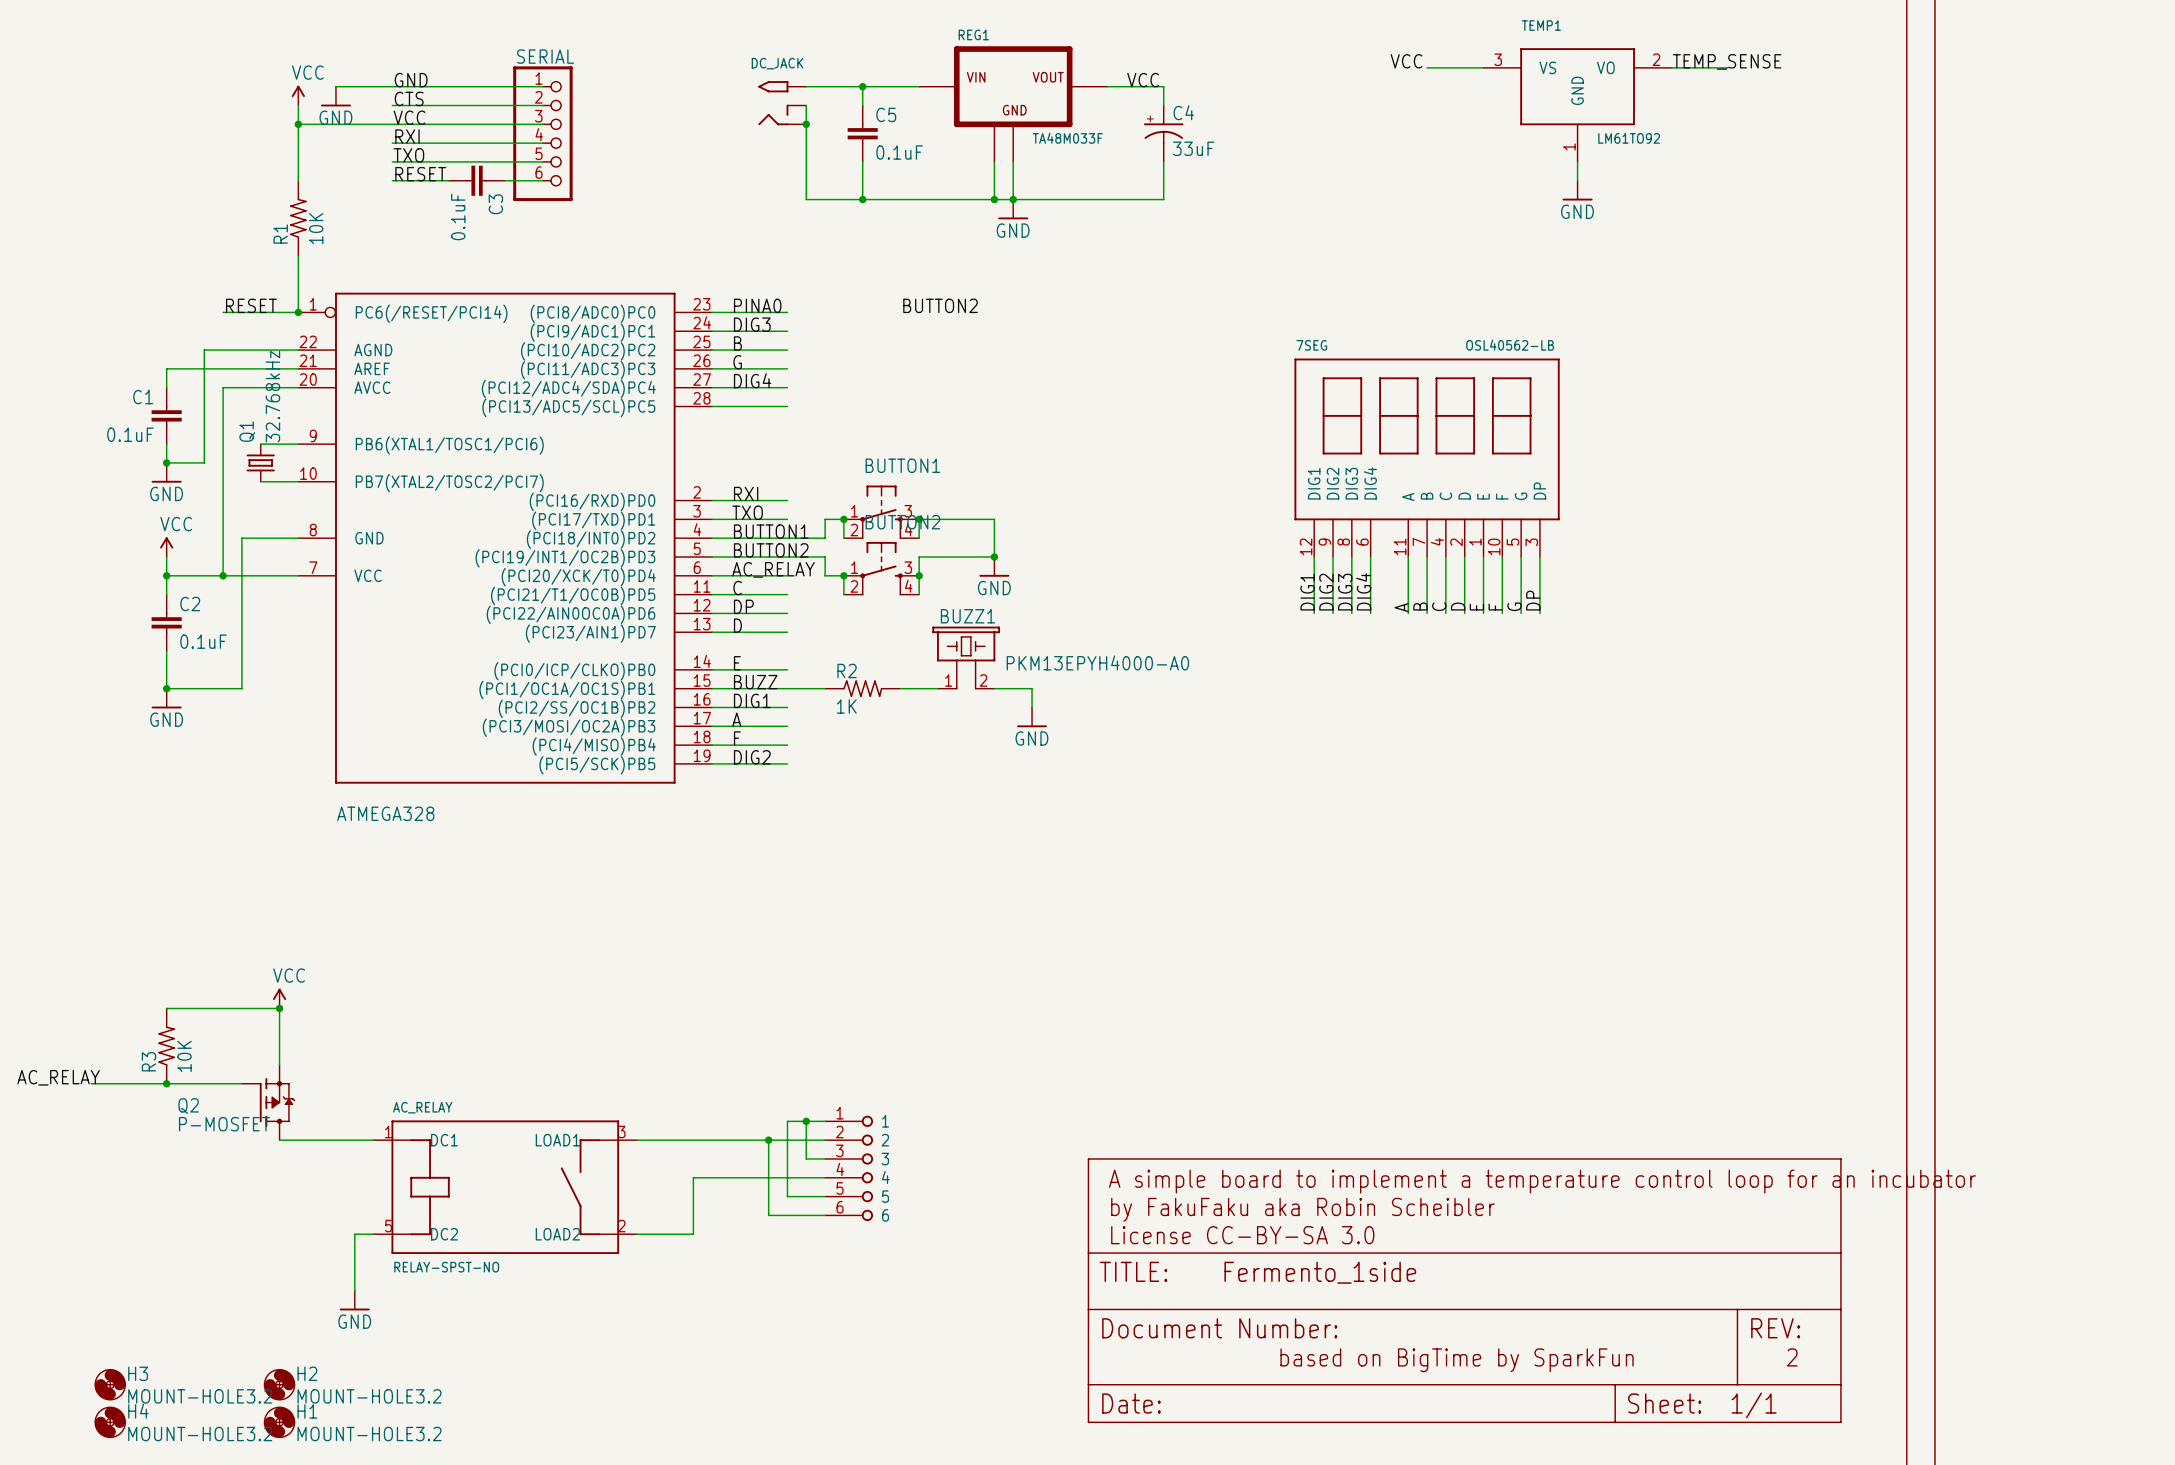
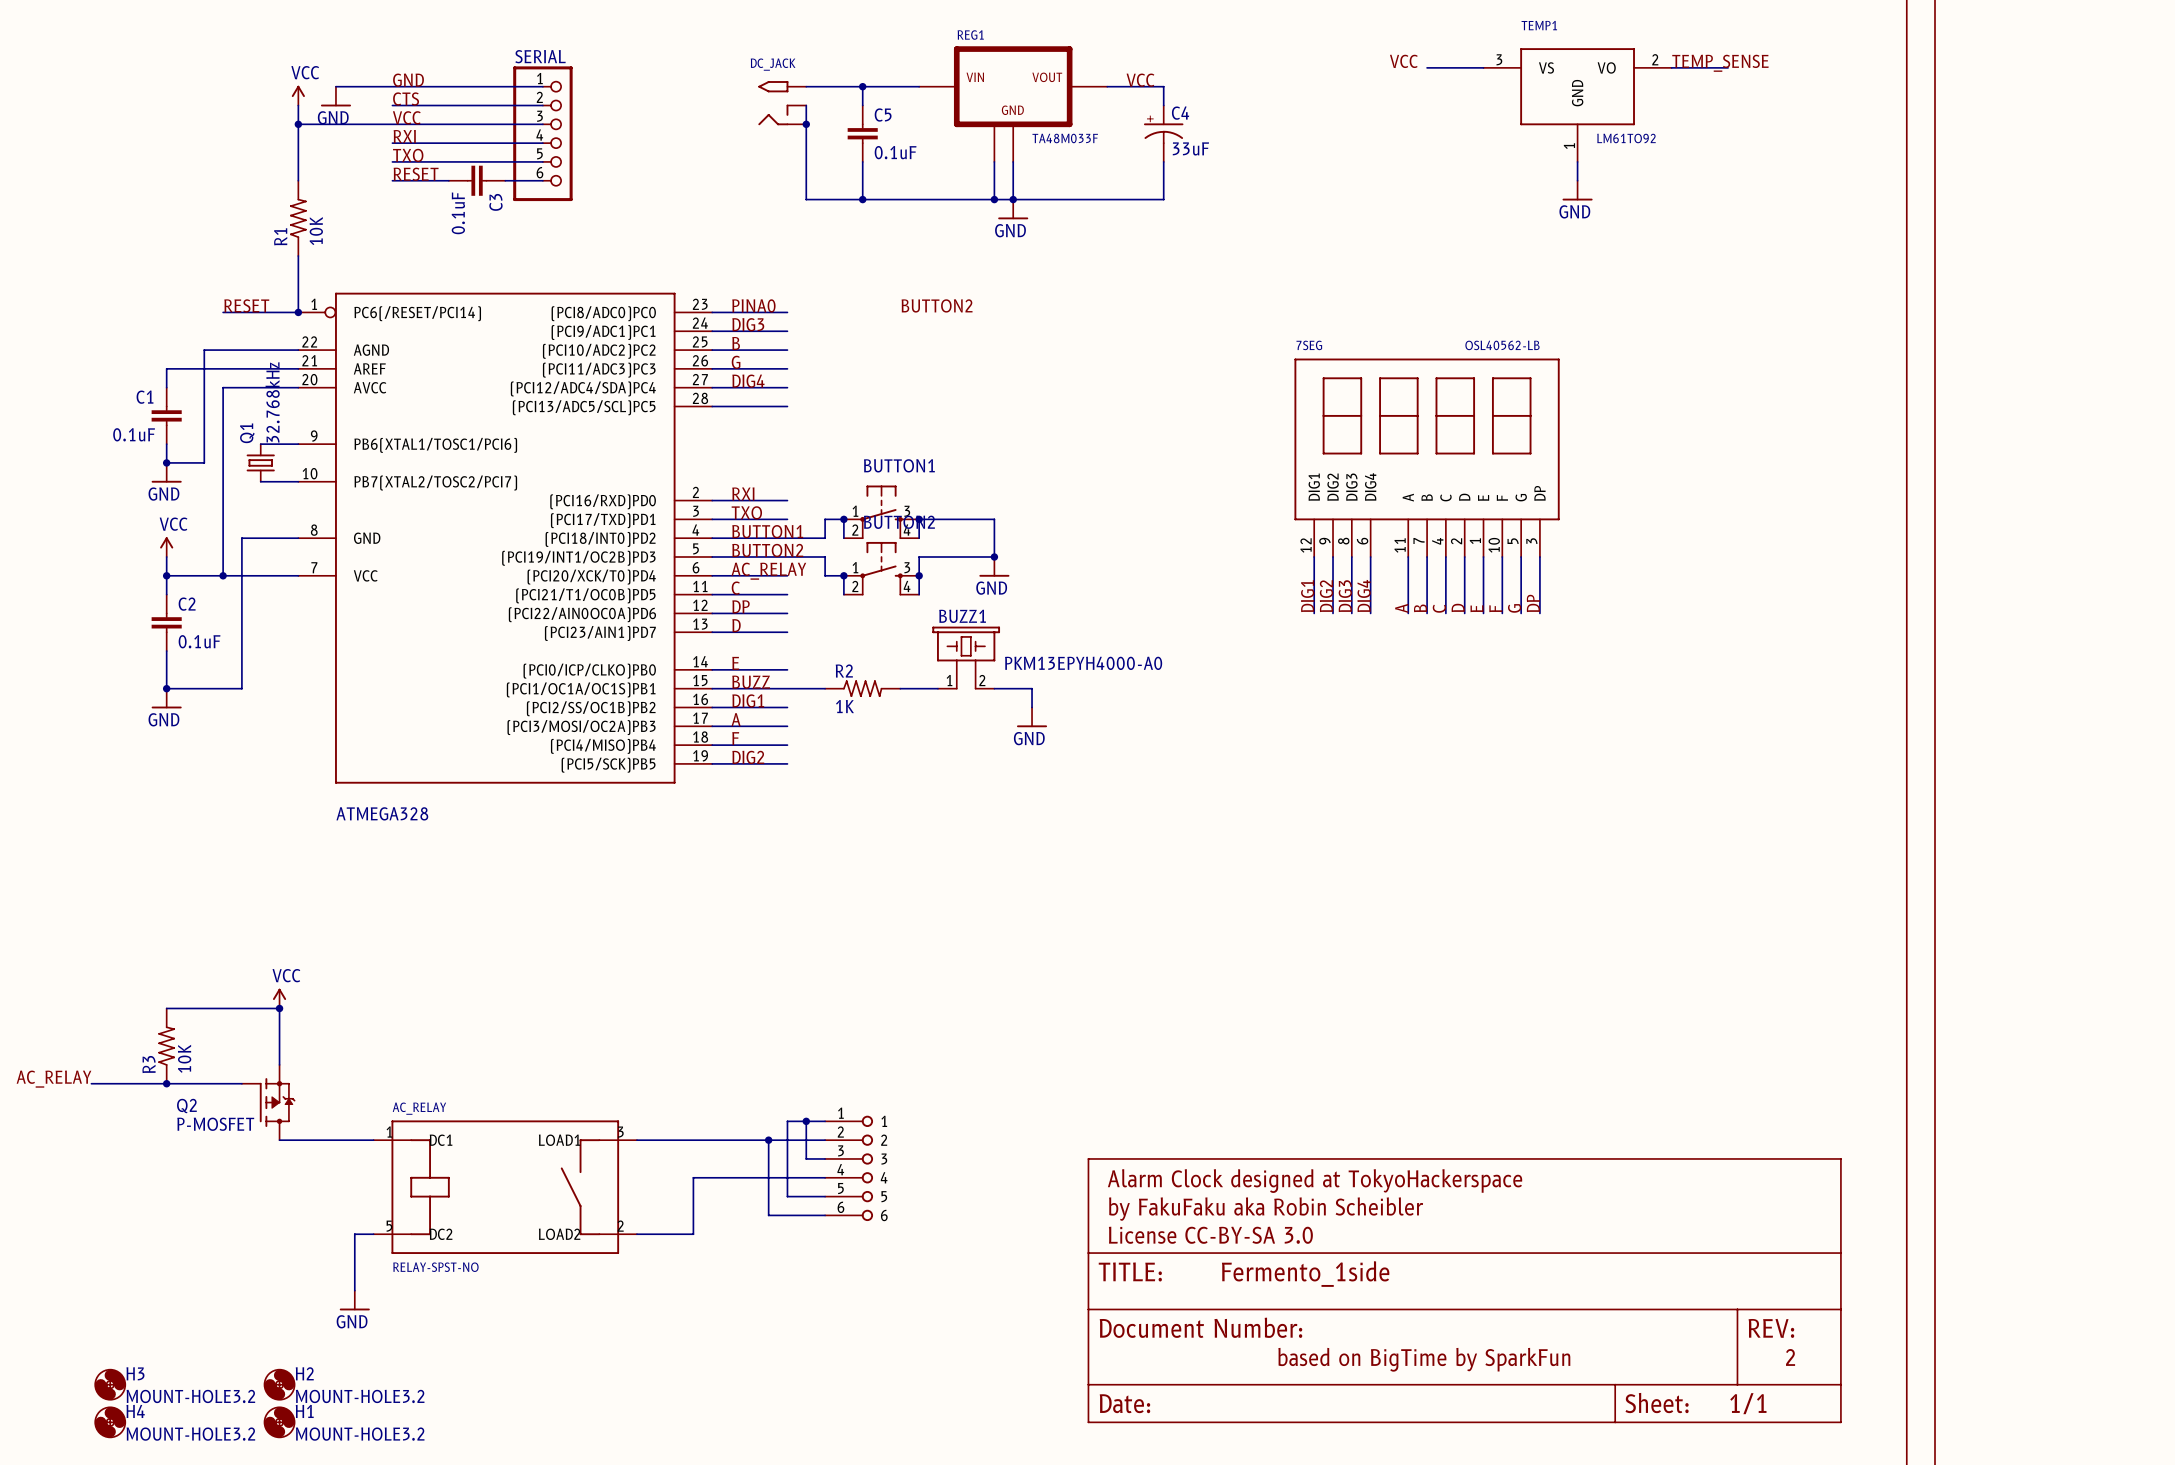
text: A simple board to implement a temperature control loop for an incubator (1542, 1181) -> Alarm Clock designed at TokyoHackerspace (1315, 1181)

